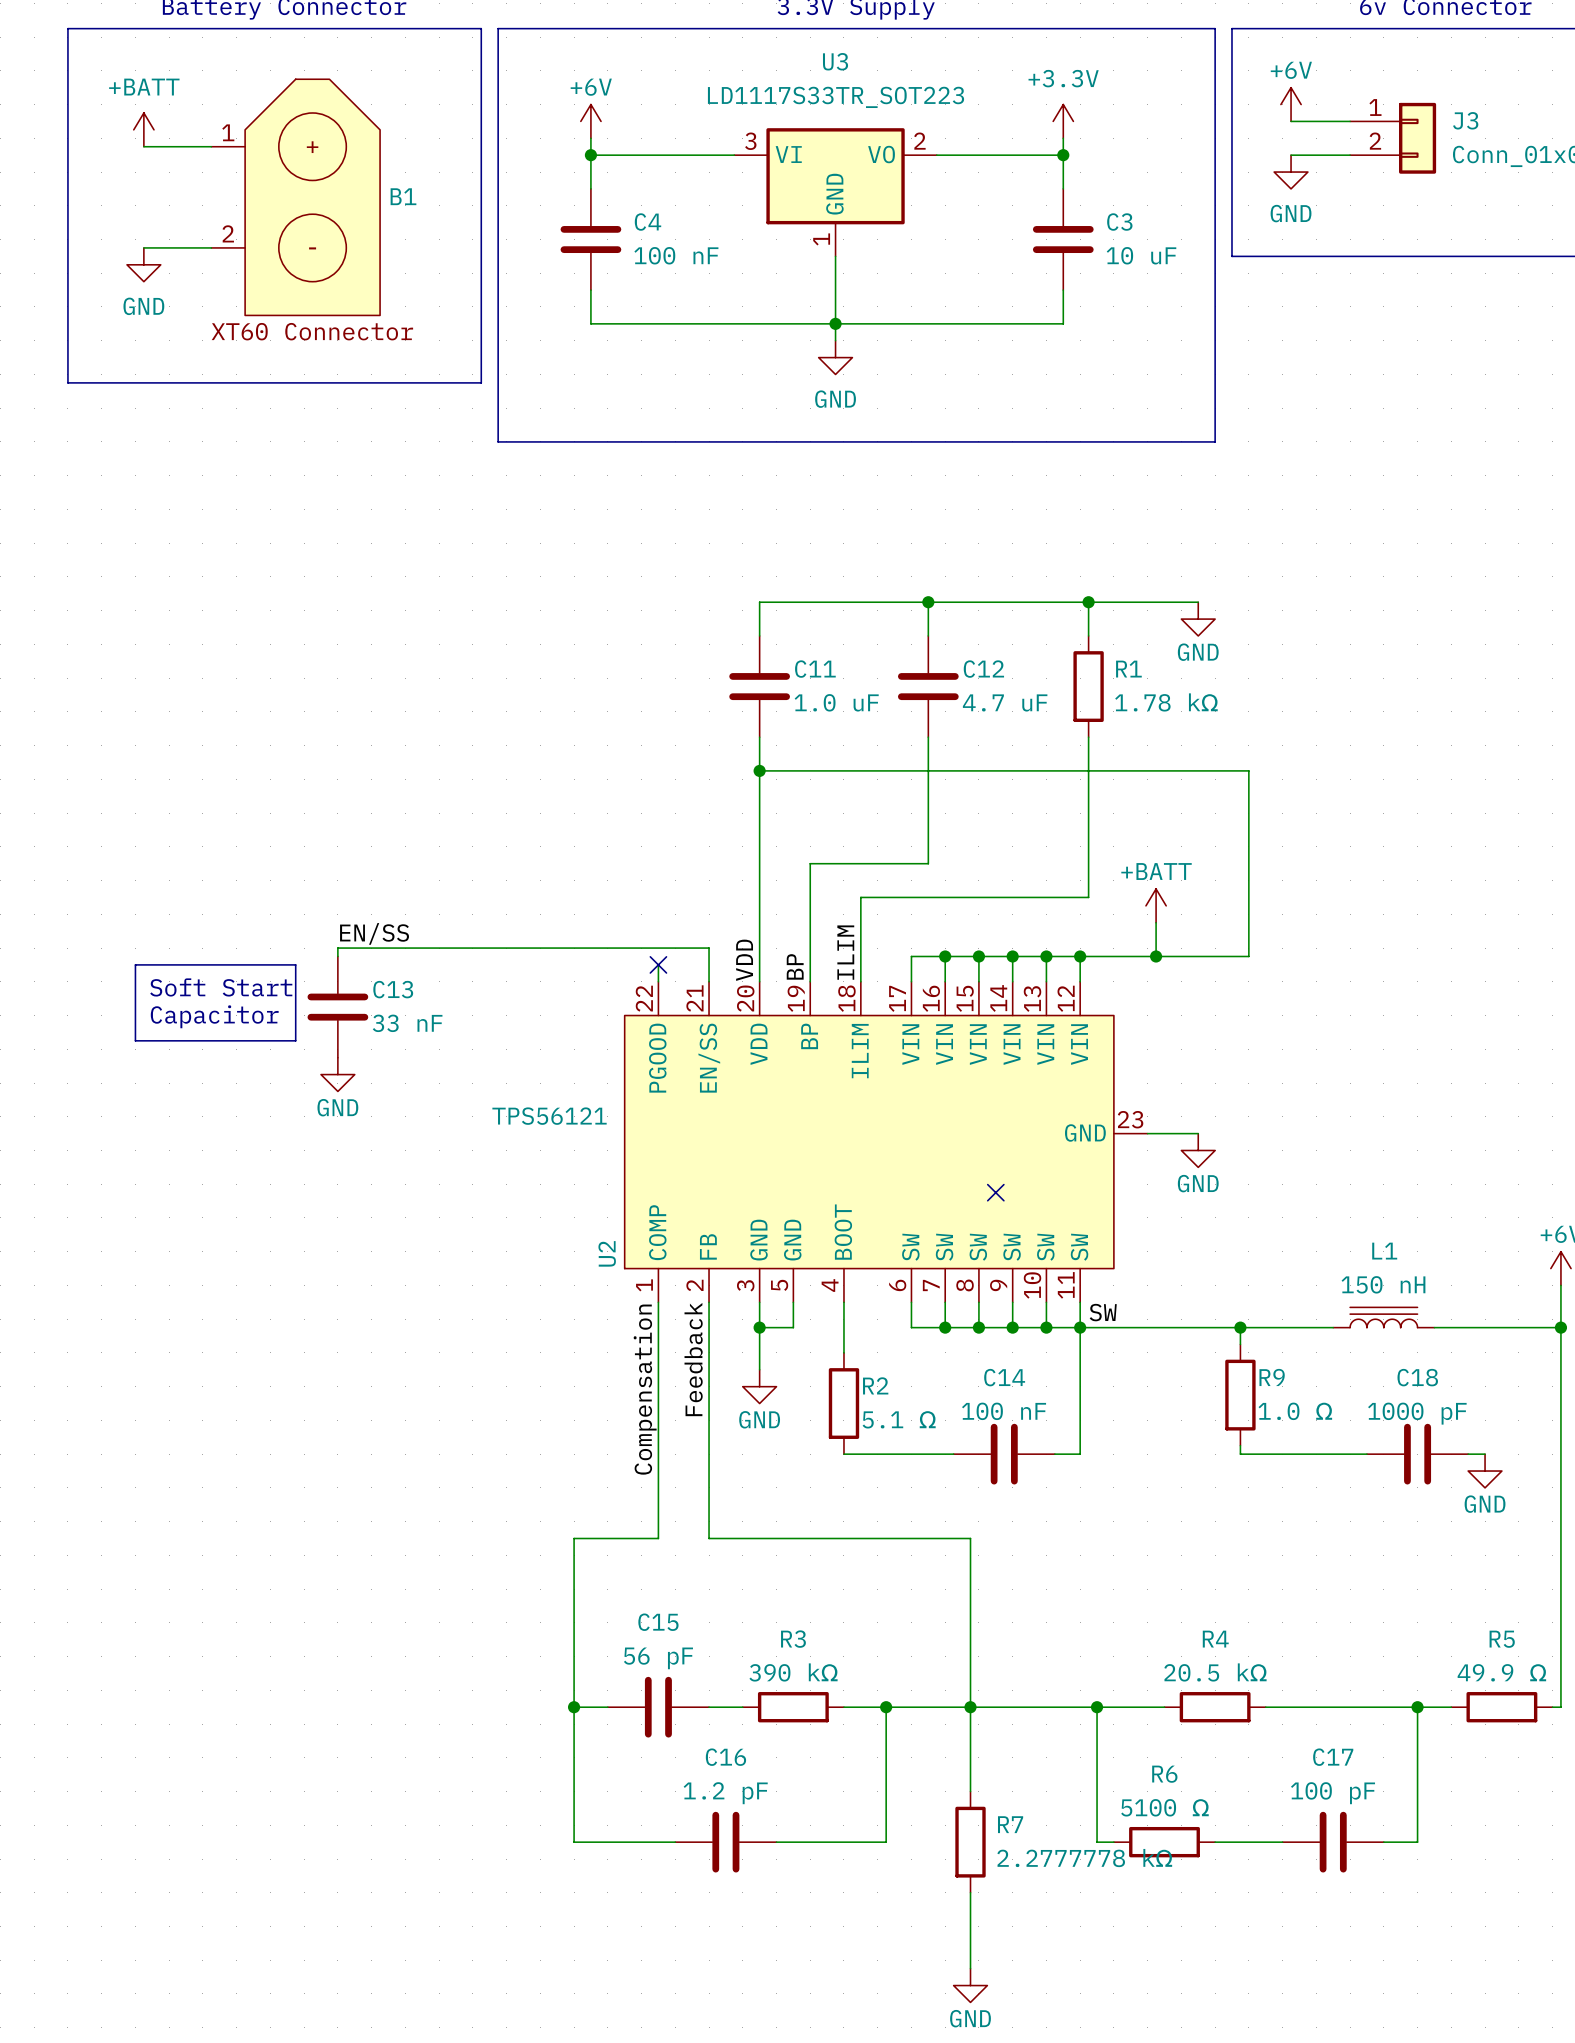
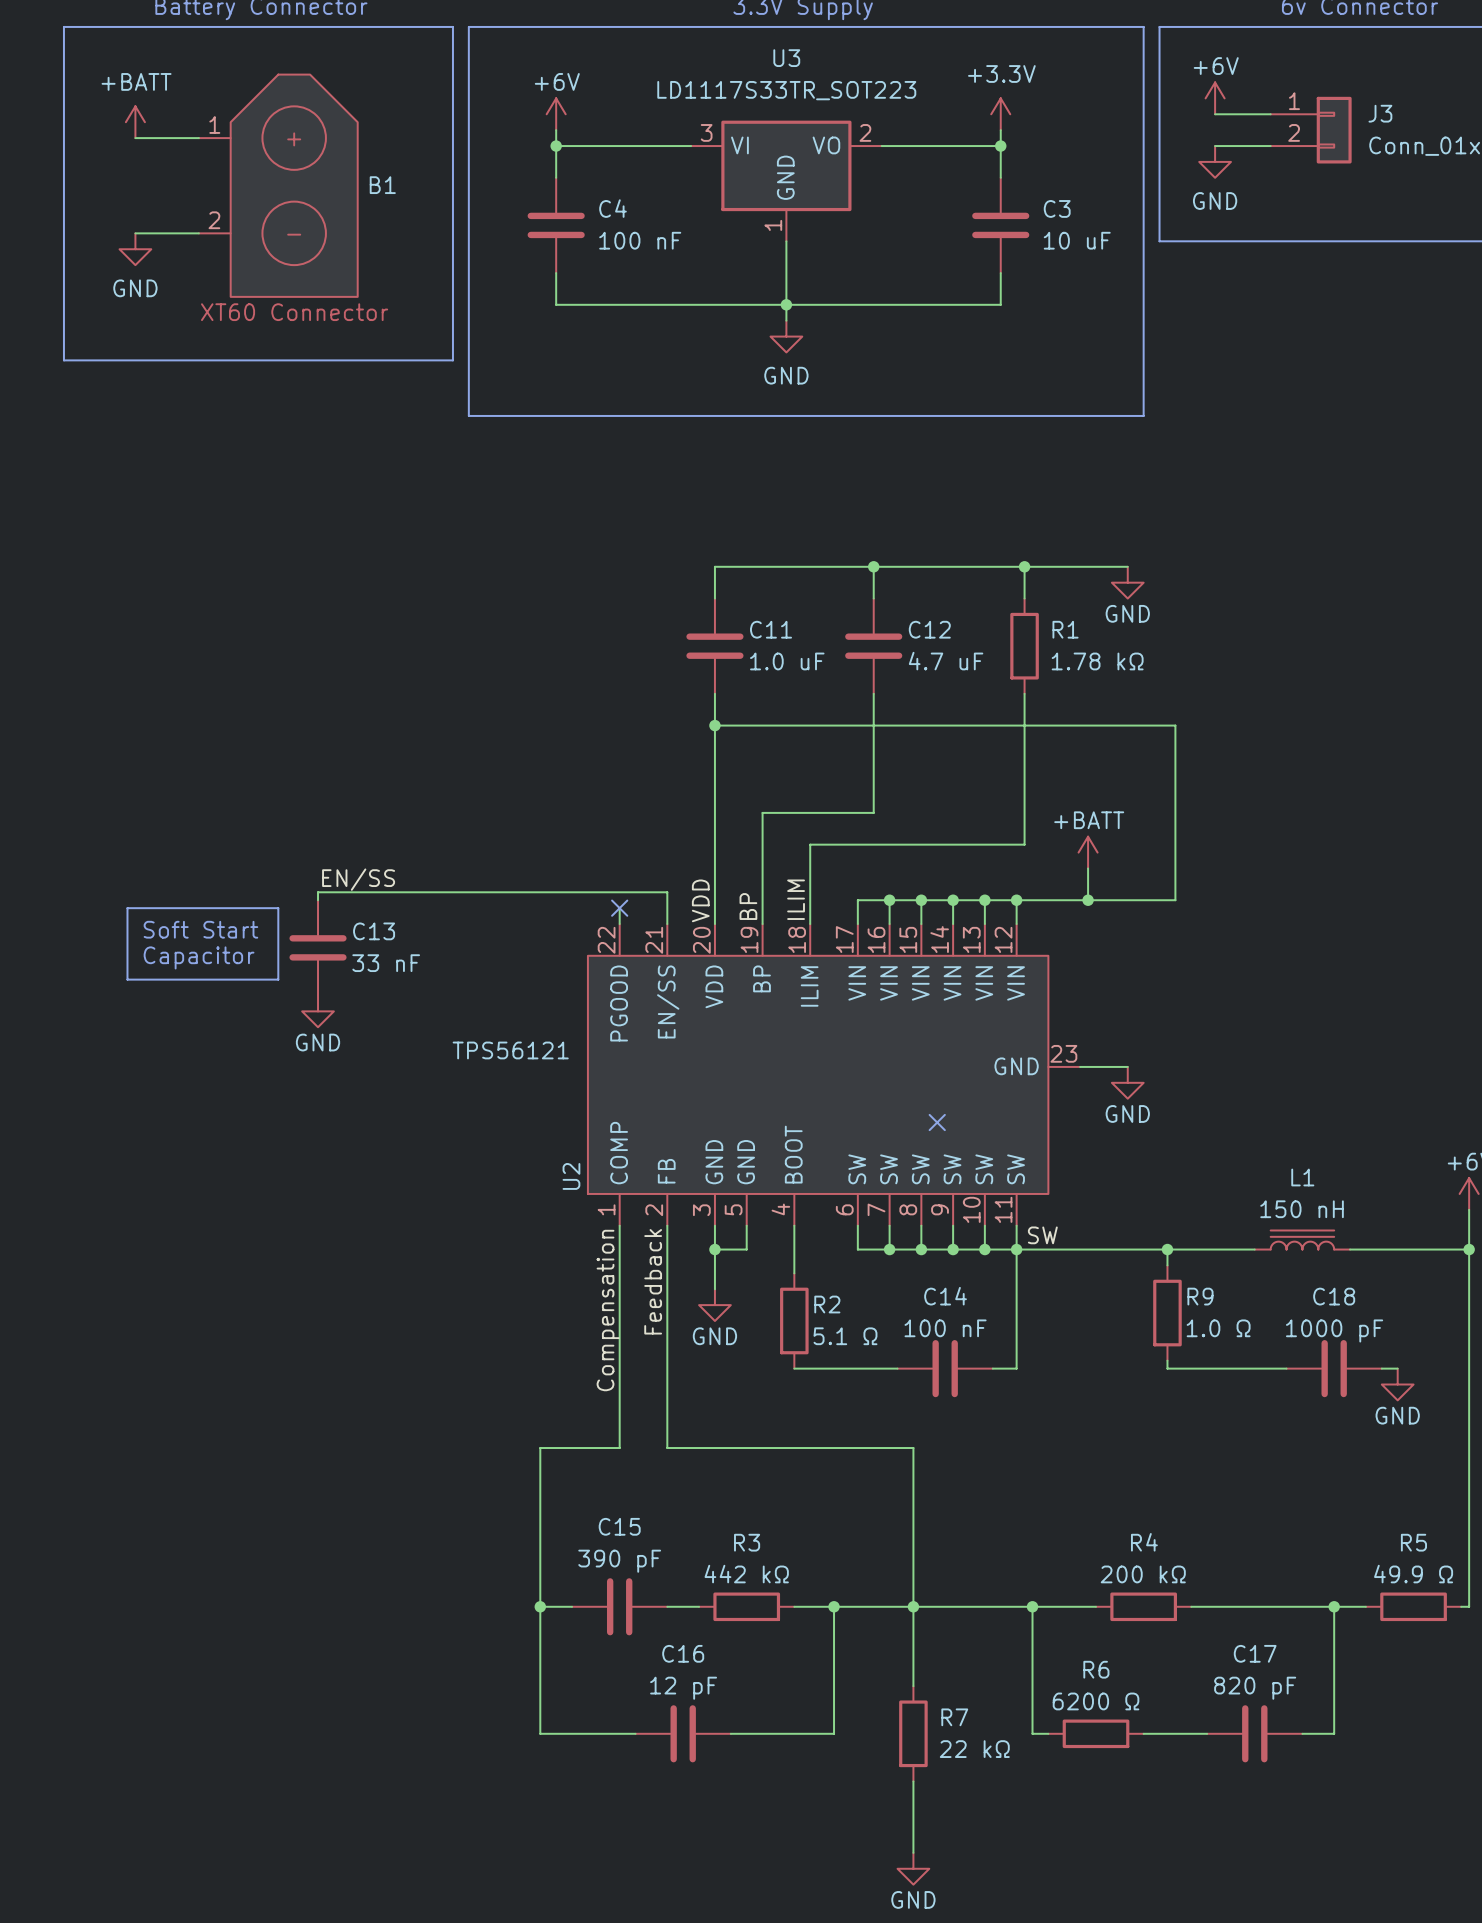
C15 value: 56 pF (658, 1658) -> 390 pF (619, 1561)
R3 value: 390 kΩ (793, 1672) -> 442 kΩ (746, 1574)
R4 value: 20.5 kΩ (1215, 1672) -> 200 kΩ (1143, 1574)
C16 value: 1.2 pF (725, 1793) -> 12 pF (683, 1688)
C17 value: 100 pF (1333, 1793) -> 820 pF (1255, 1688)
R6 value: 5100 Ω (1164, 1807) -> 6200 Ω (1096, 1701)
R7 value: 2.2777778 kΩ (1084, 1858) -> 22 kΩ (974, 1749)

